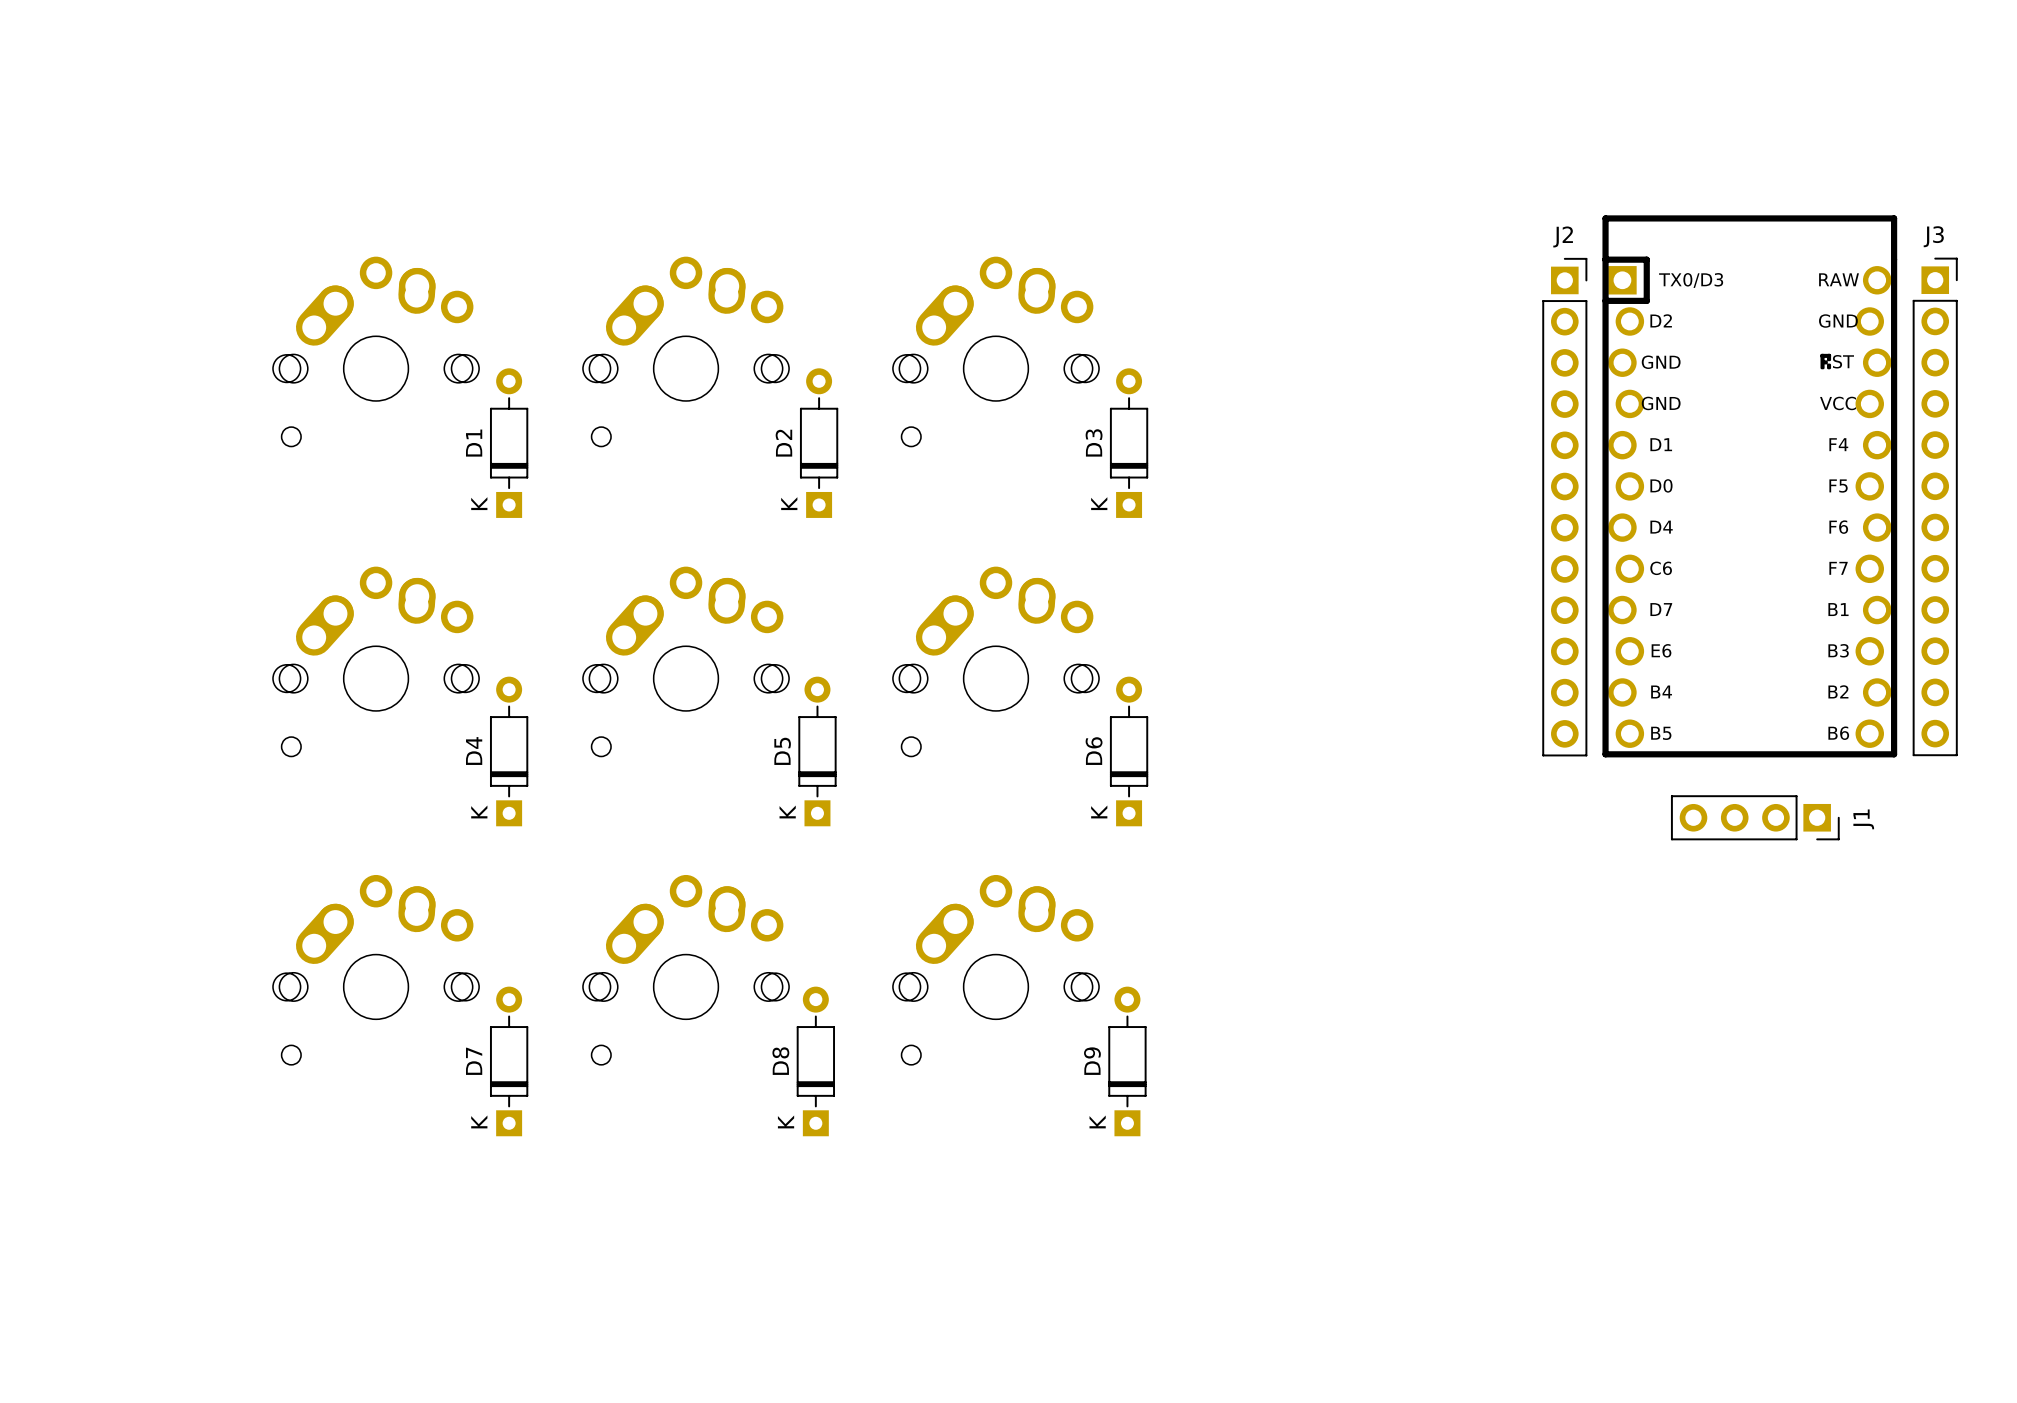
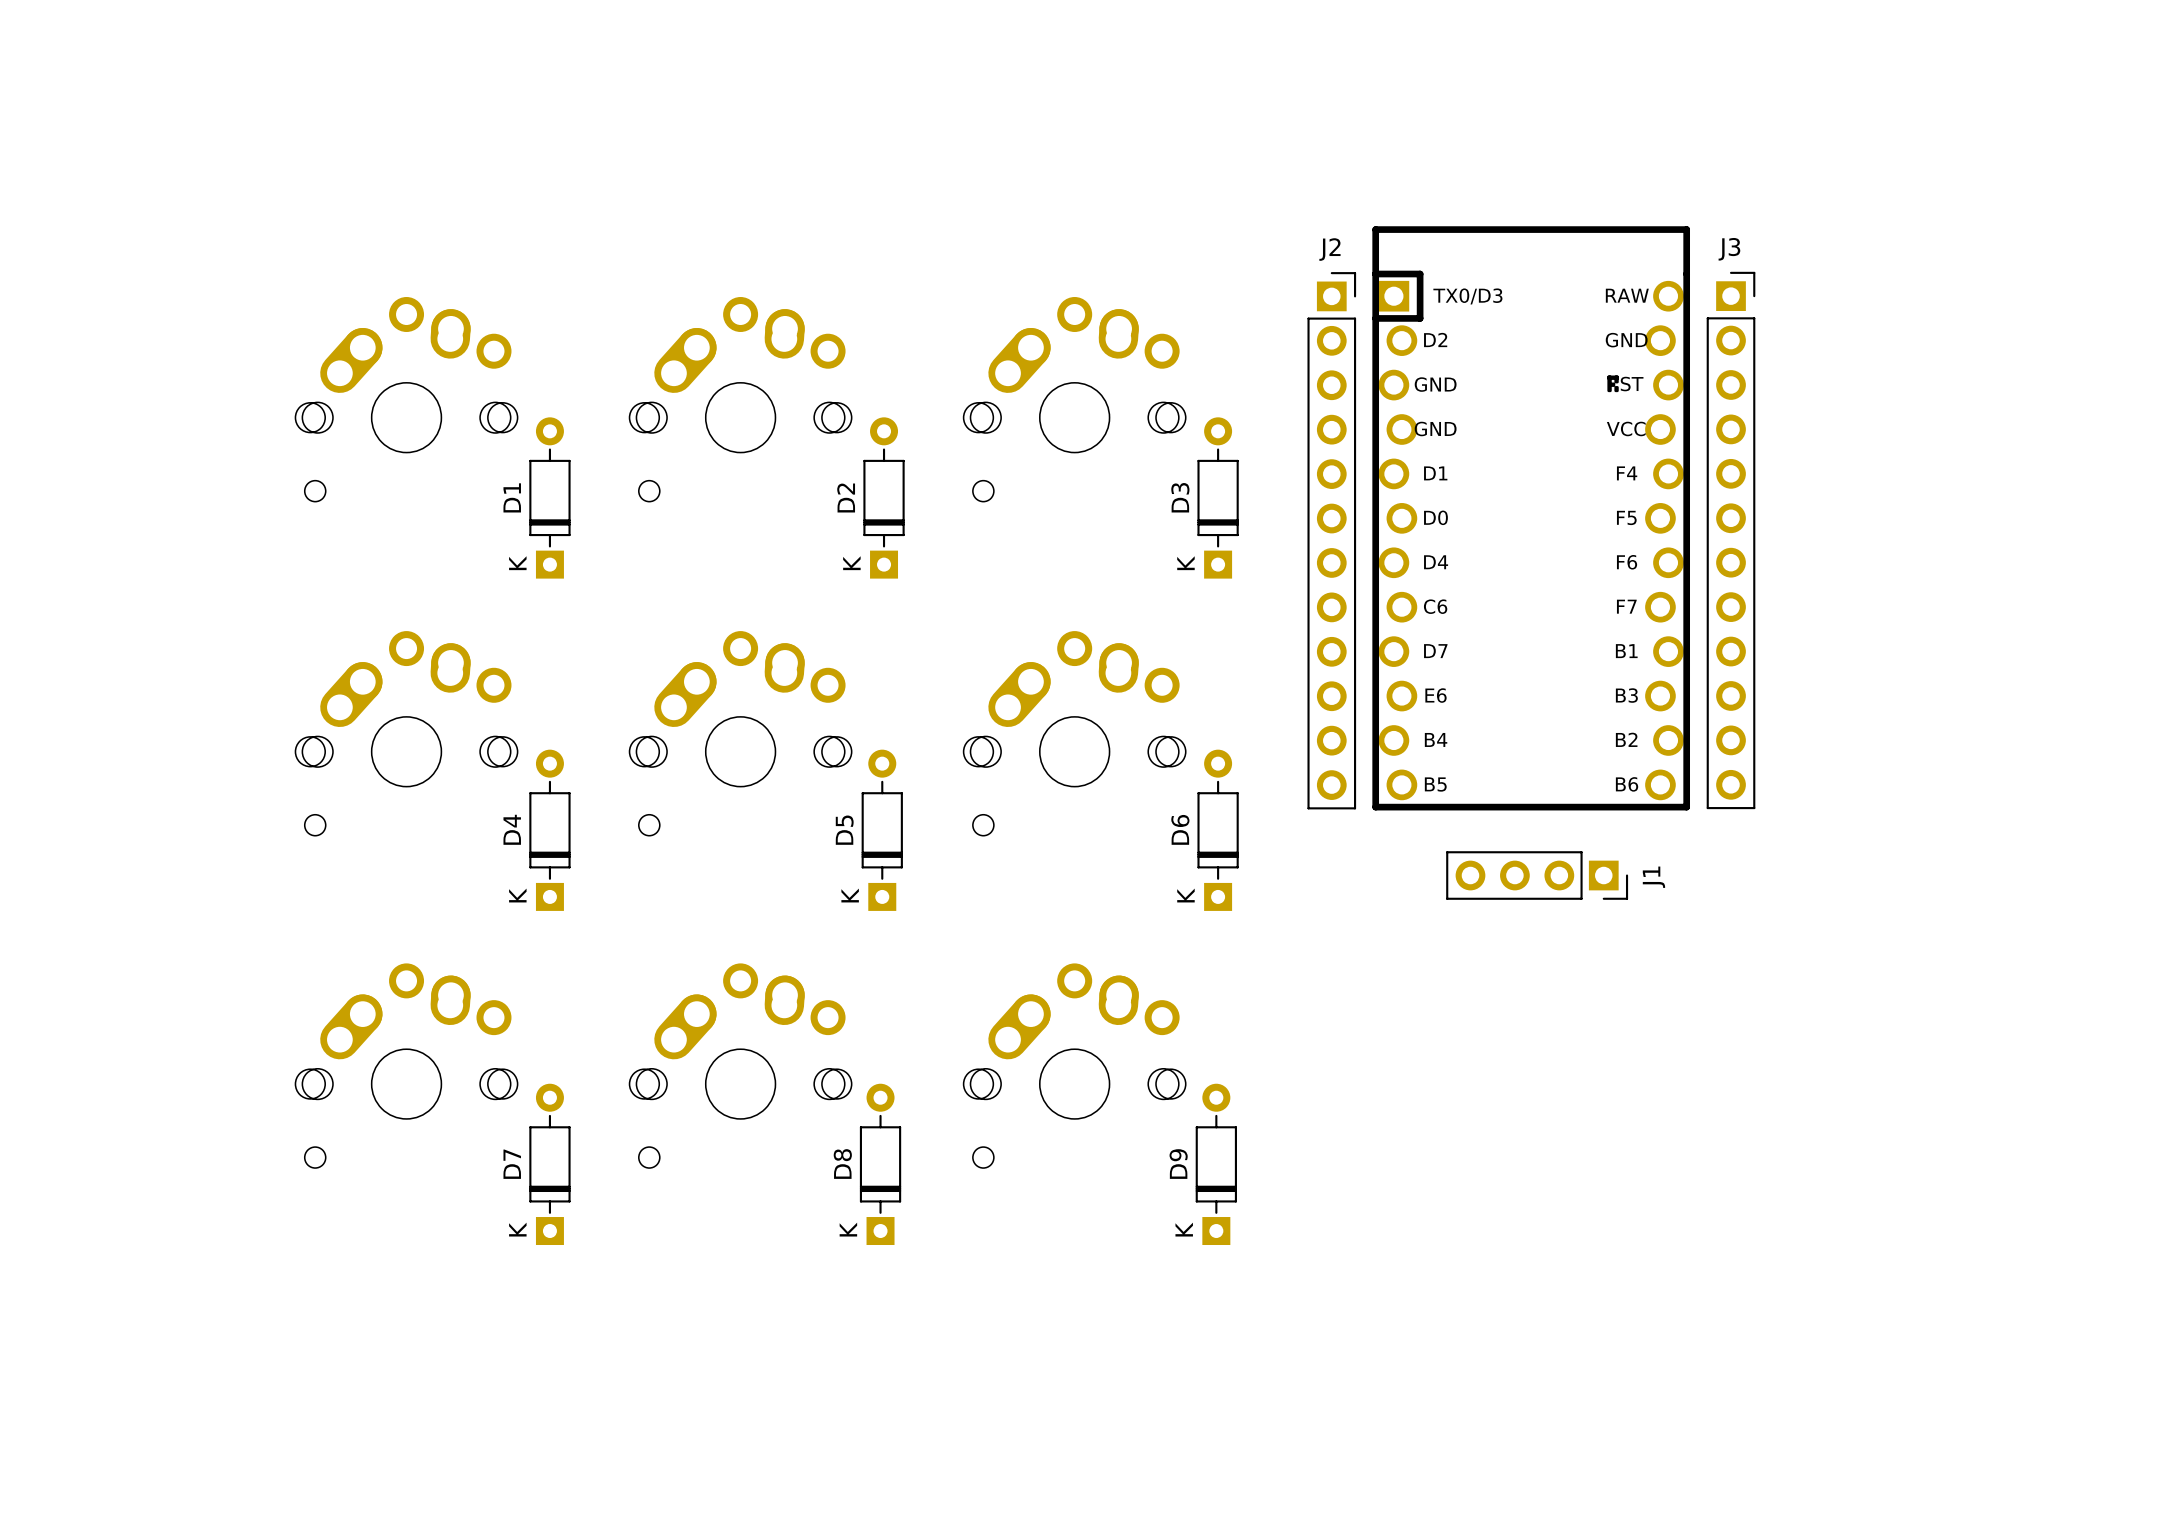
part position: (1749, 486) -> (1531, 518)
J3 position: (1935, 506) -> (1731, 540)
J2 position: (1564, 507) -> (1331, 540)
J1 position: (1755, 817) -> (1537, 875)

